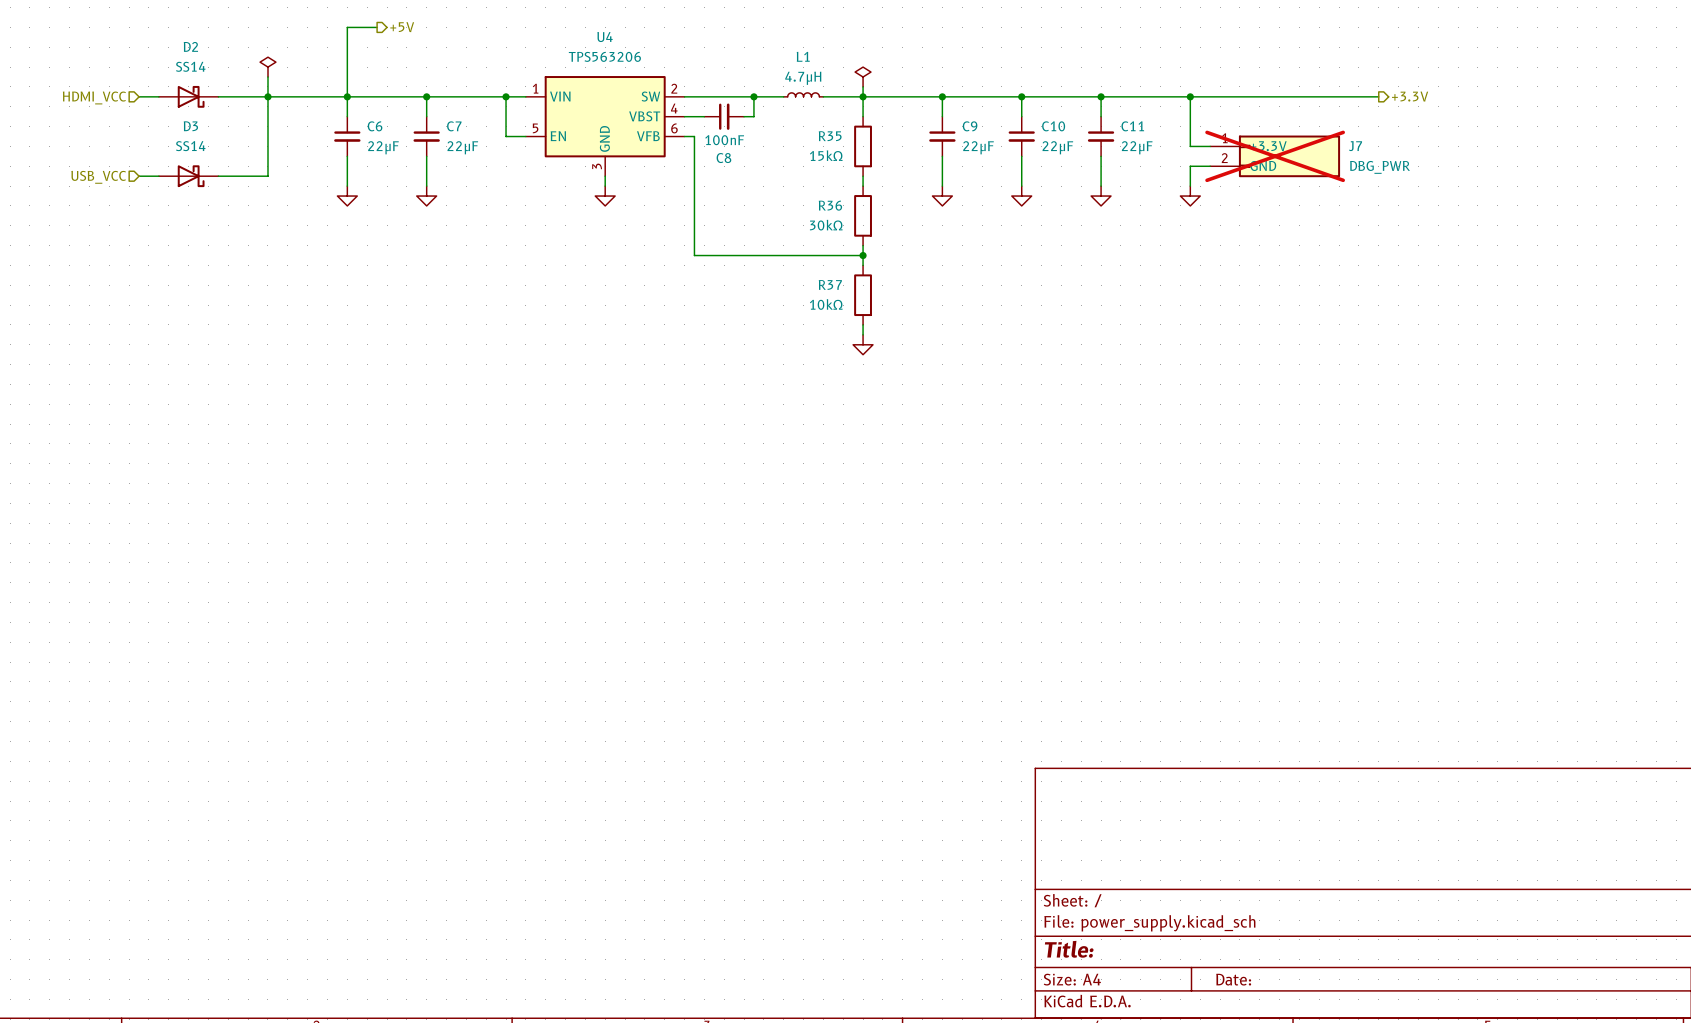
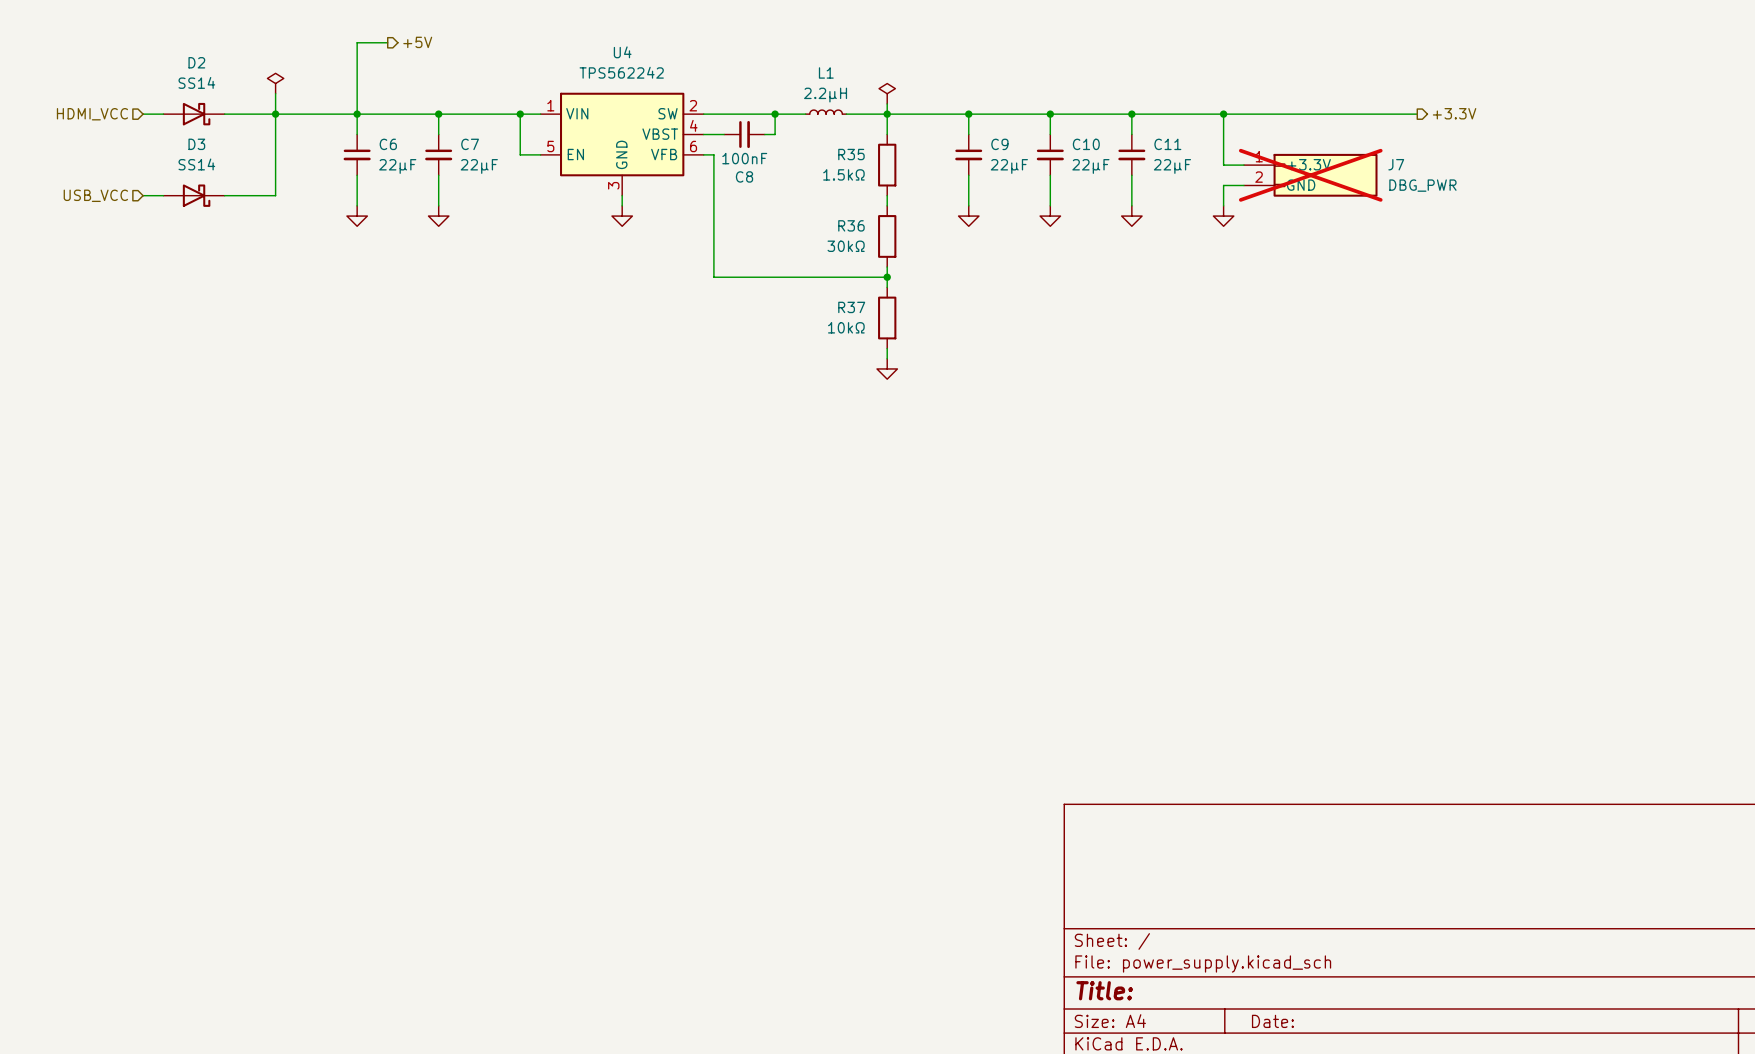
U4 value: TPS563206 (604, 56) -> TPS562242 (621, 72)
L1 value: 4.7μH (803, 78) -> 2.2μH (825, 95)
R35 value: 15kΩ (826, 155) -> 1.5kΩ (843, 174)

